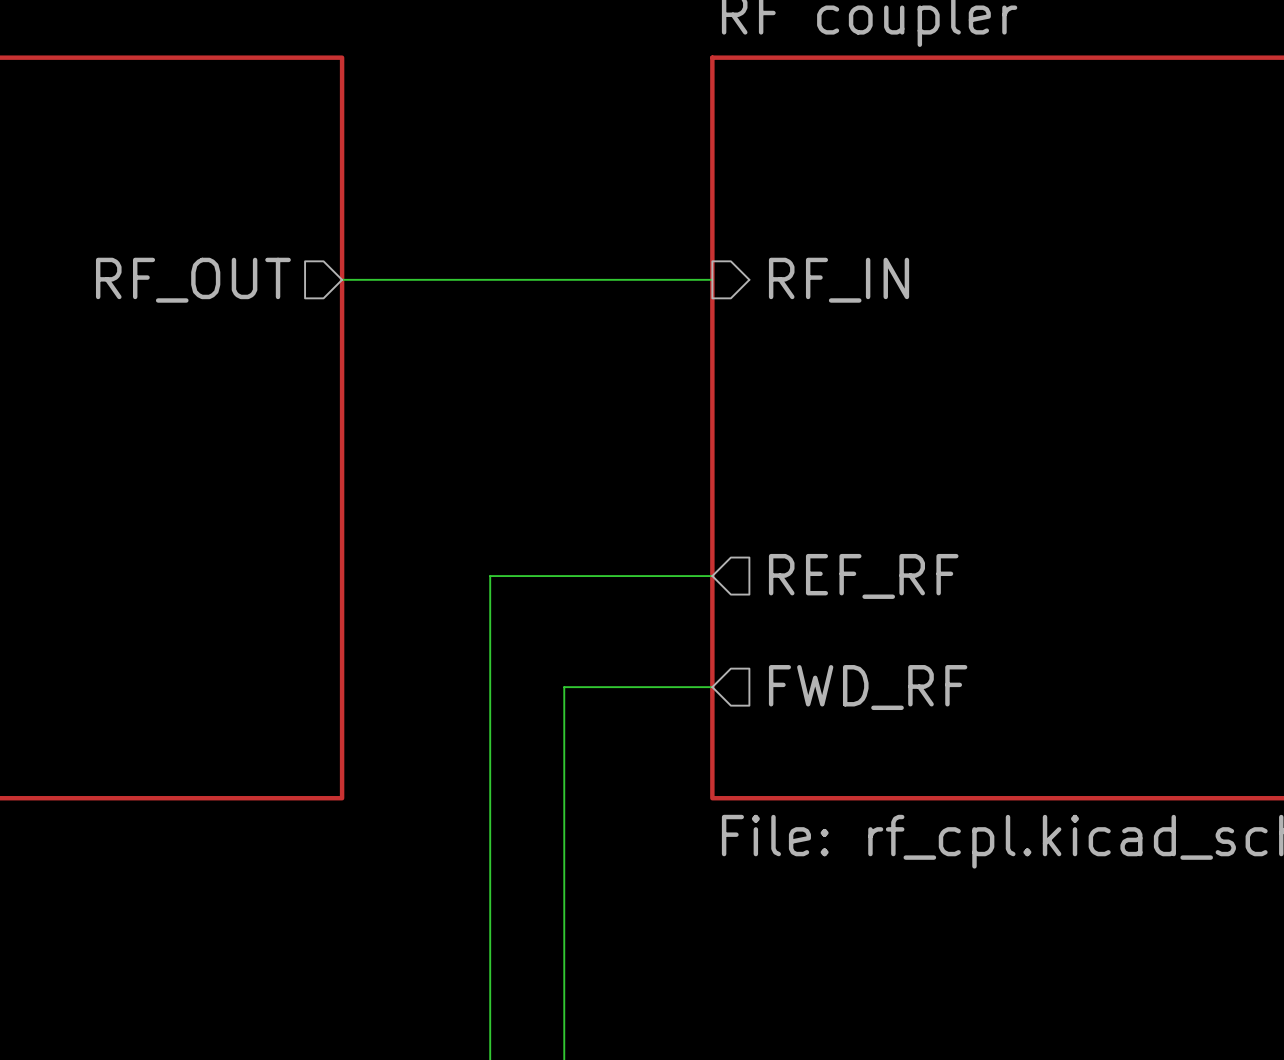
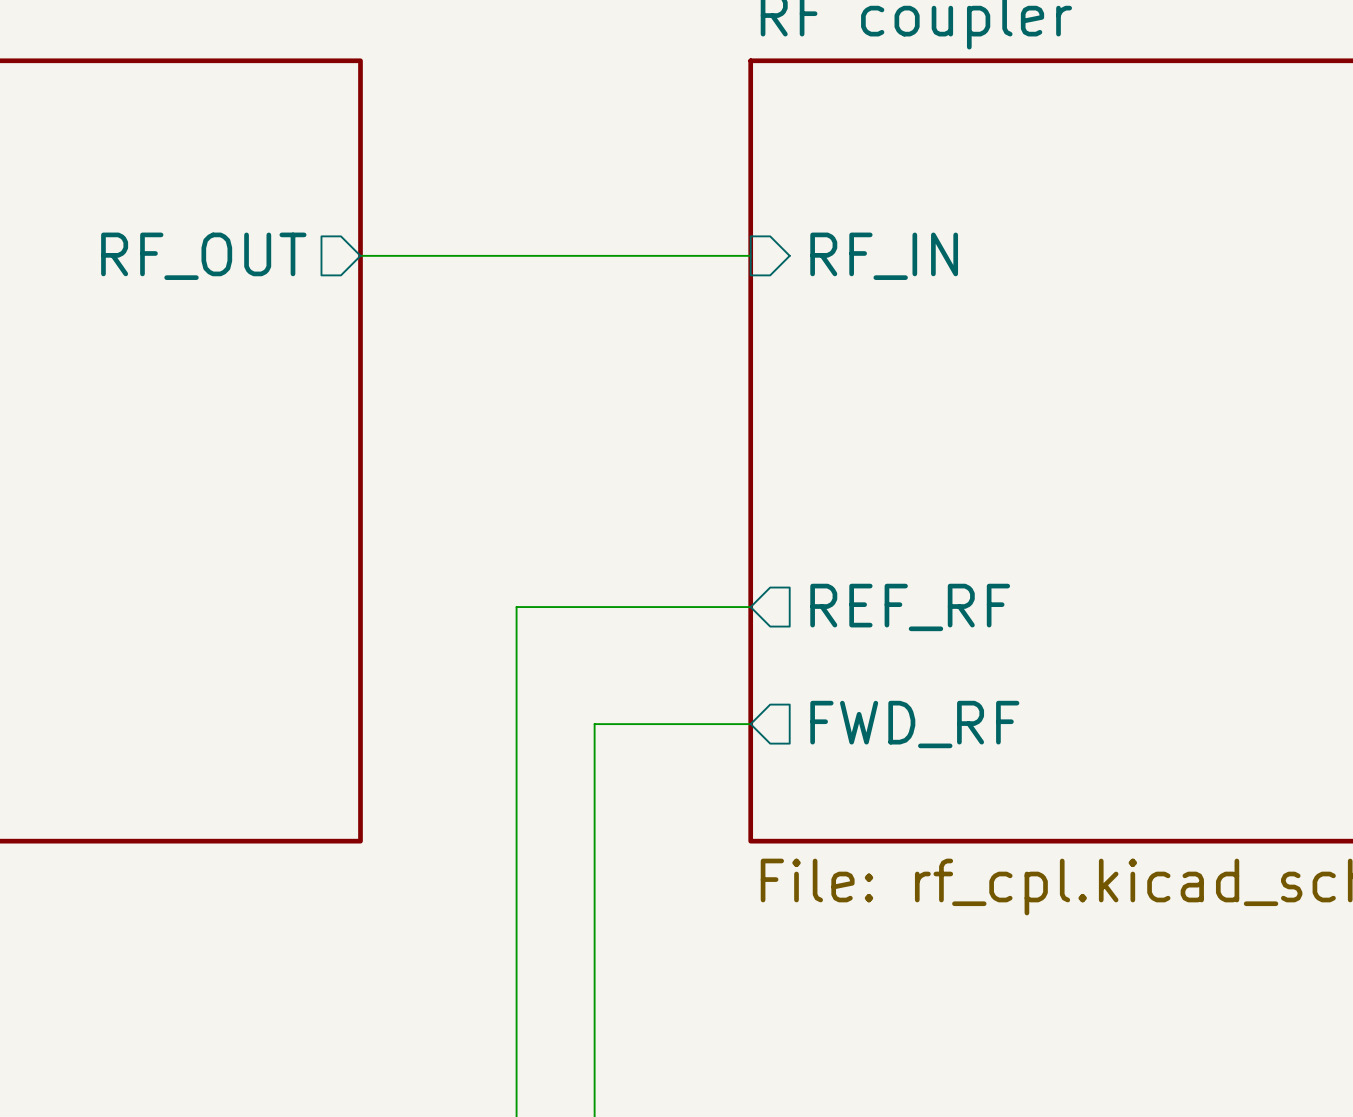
wire: (342, 279) (712, 279) -> (360, 255) (750, 255)
sheet pin position: RF_OUT (193, 280) -> RF_OUT (203, 256)
sheet pin position: RF_IN (839, 280) -> RF_IN (884, 256)

